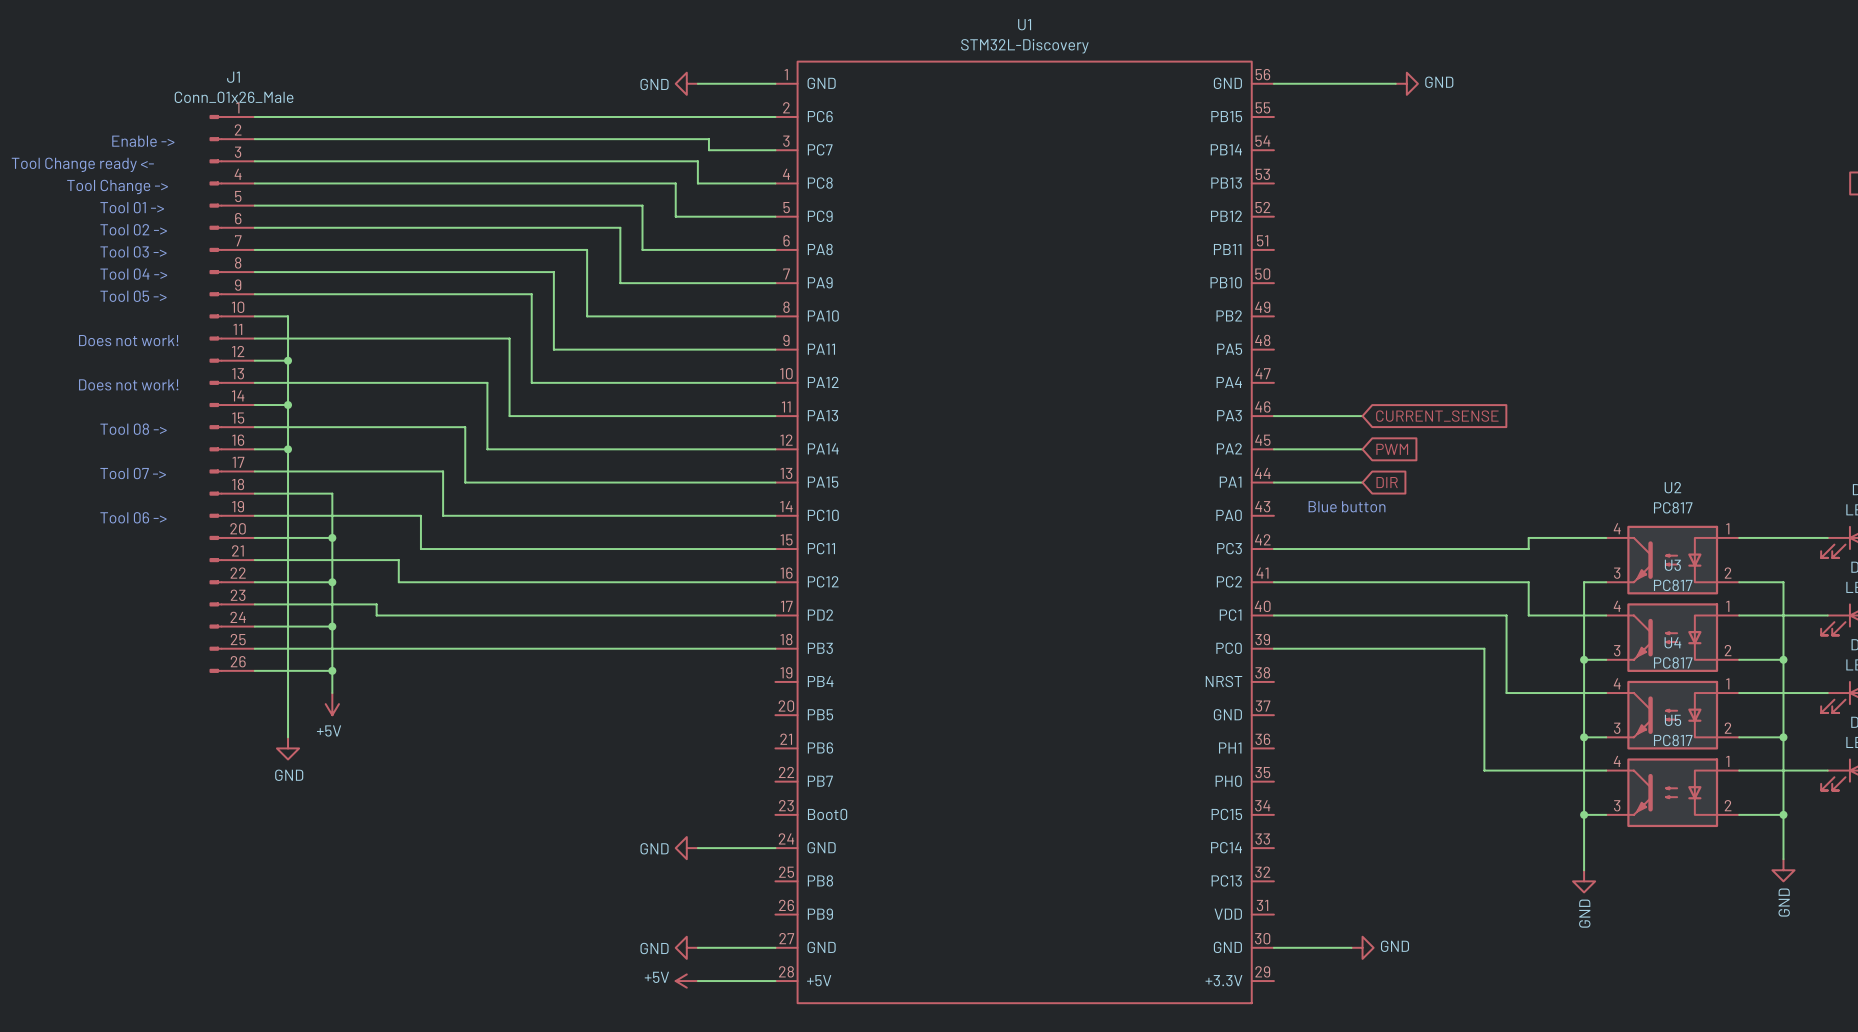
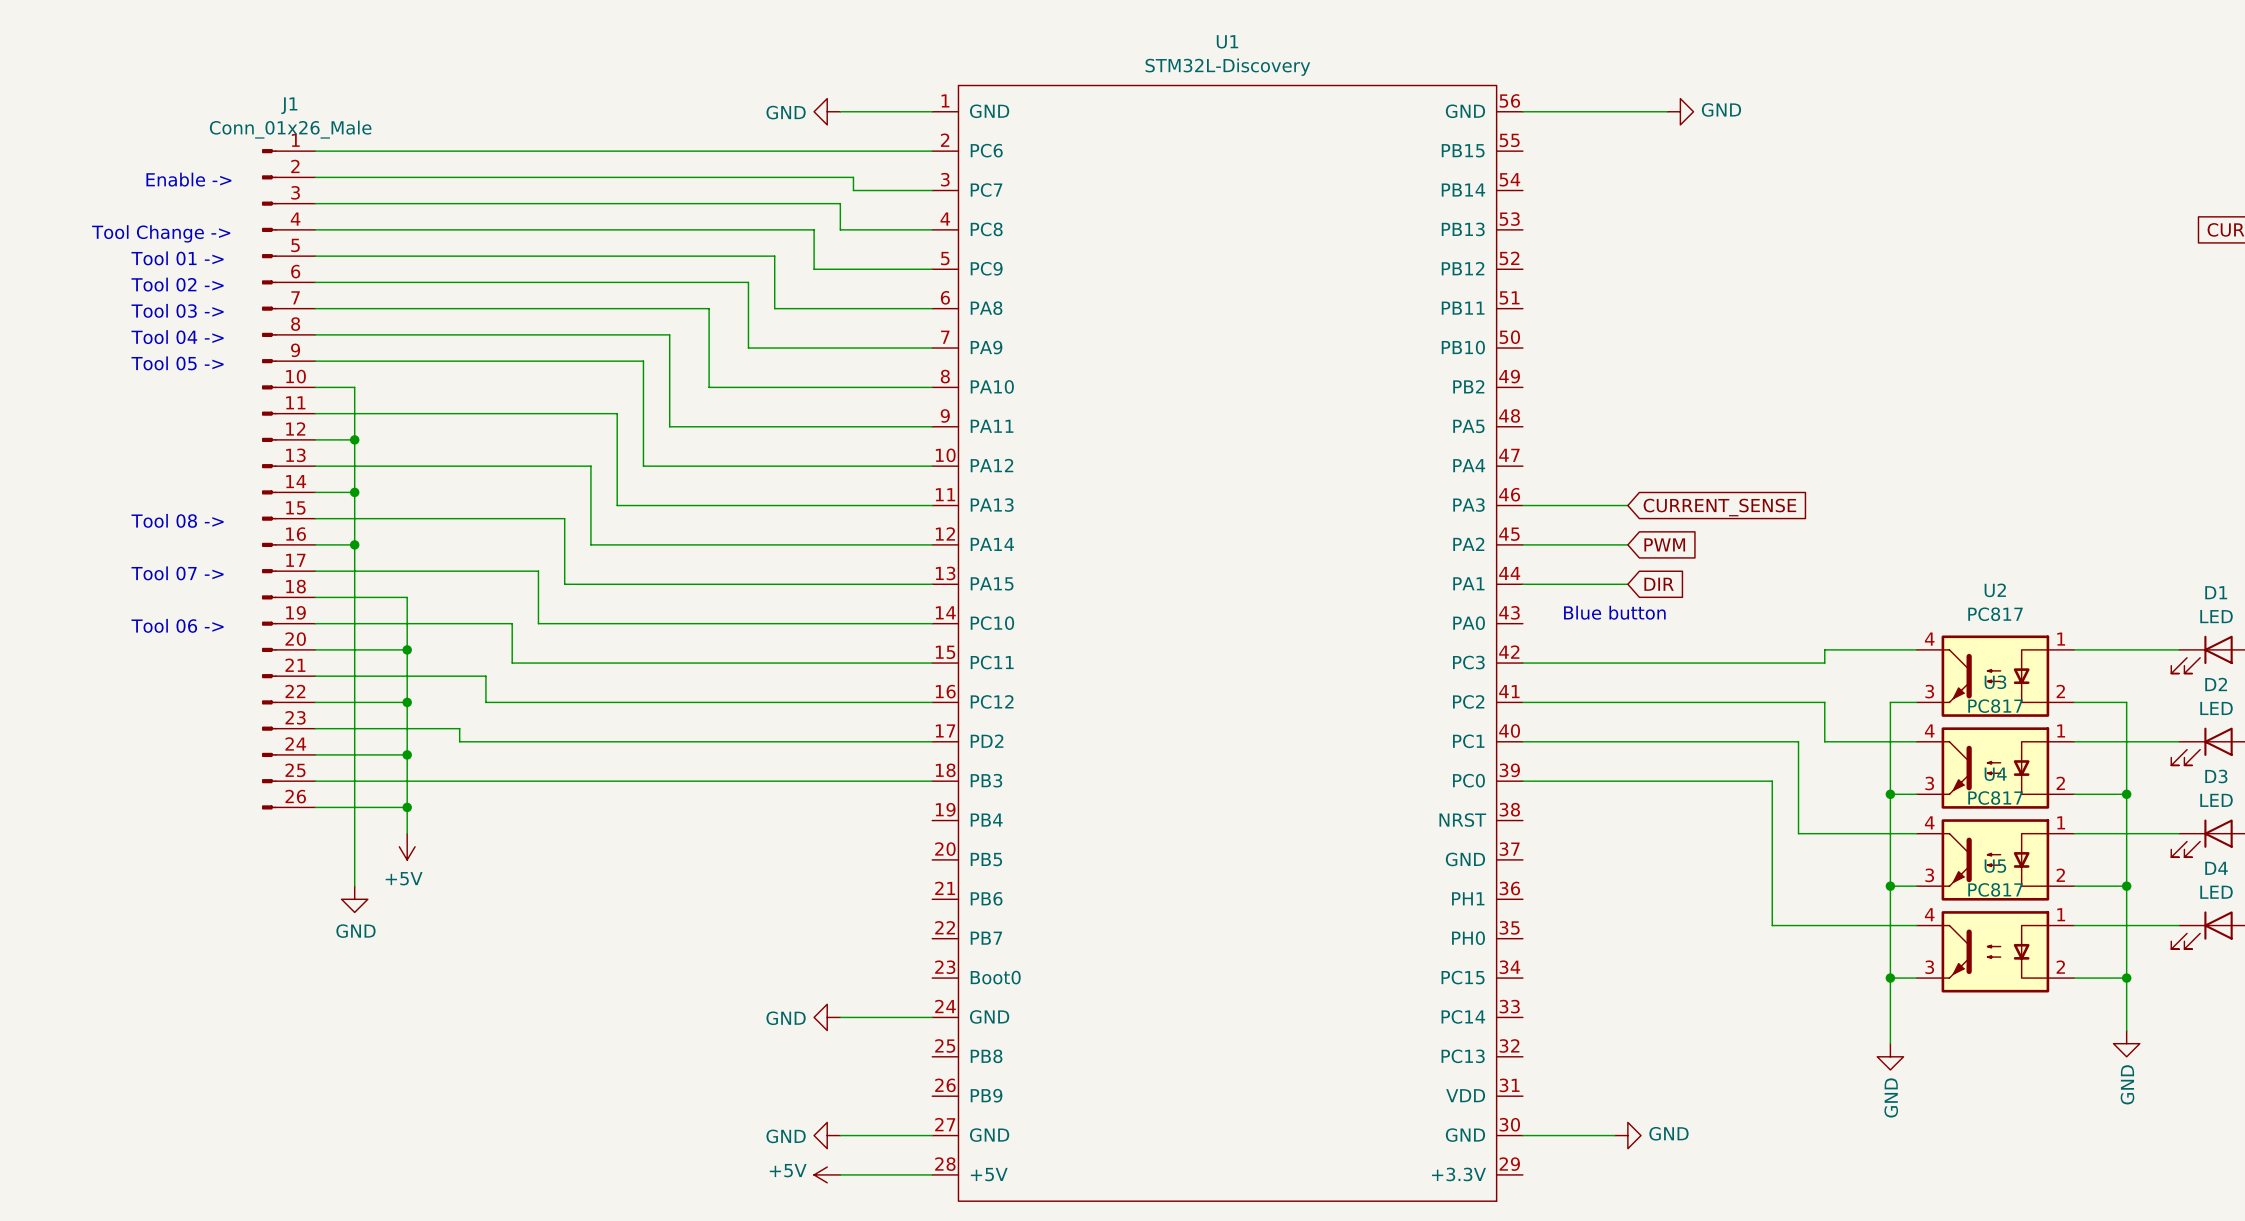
text: Tool Change ready <- (82, 164) -> none
text: Does not work! (128, 340) -> none
text: Does not work! (128, 384) -> none

